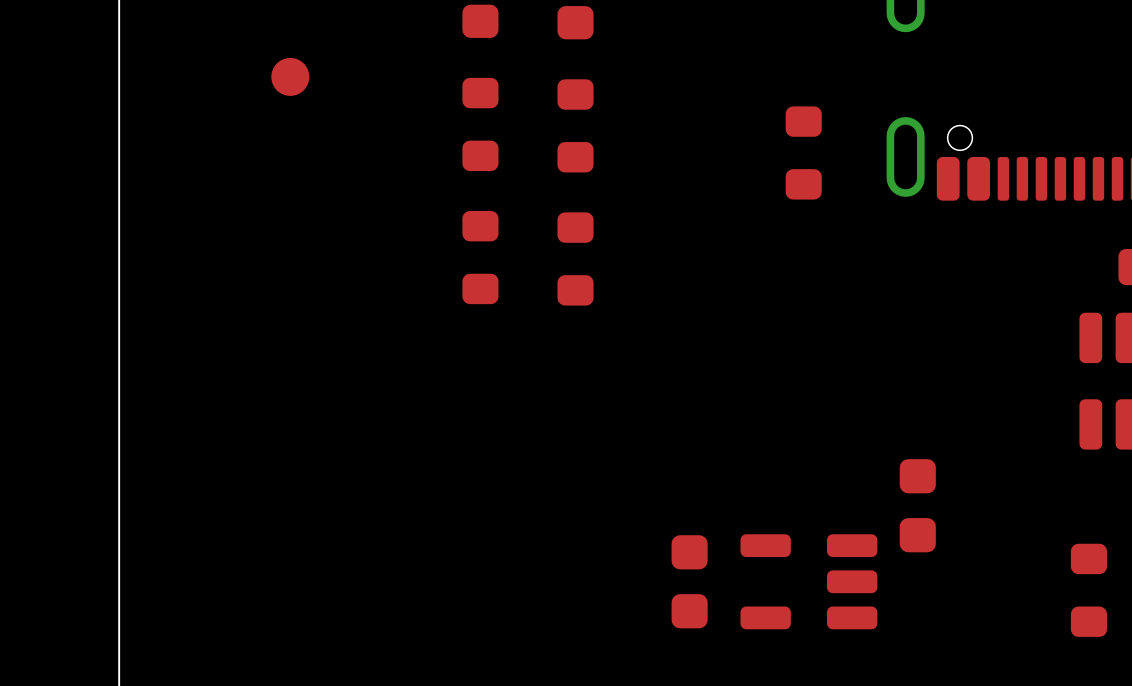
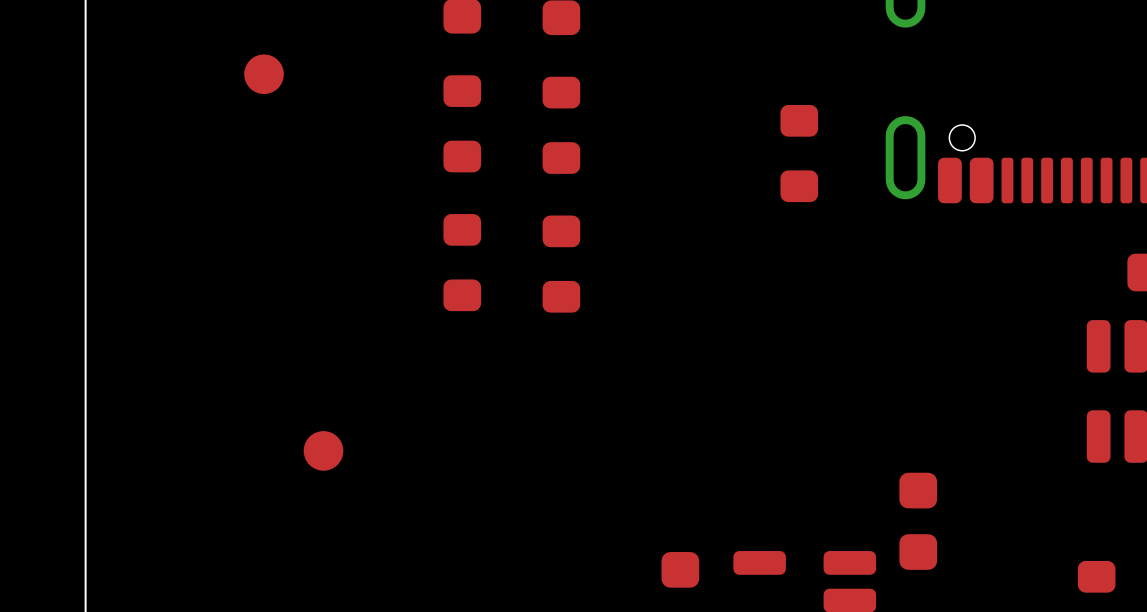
part: none -> (323, 450)

